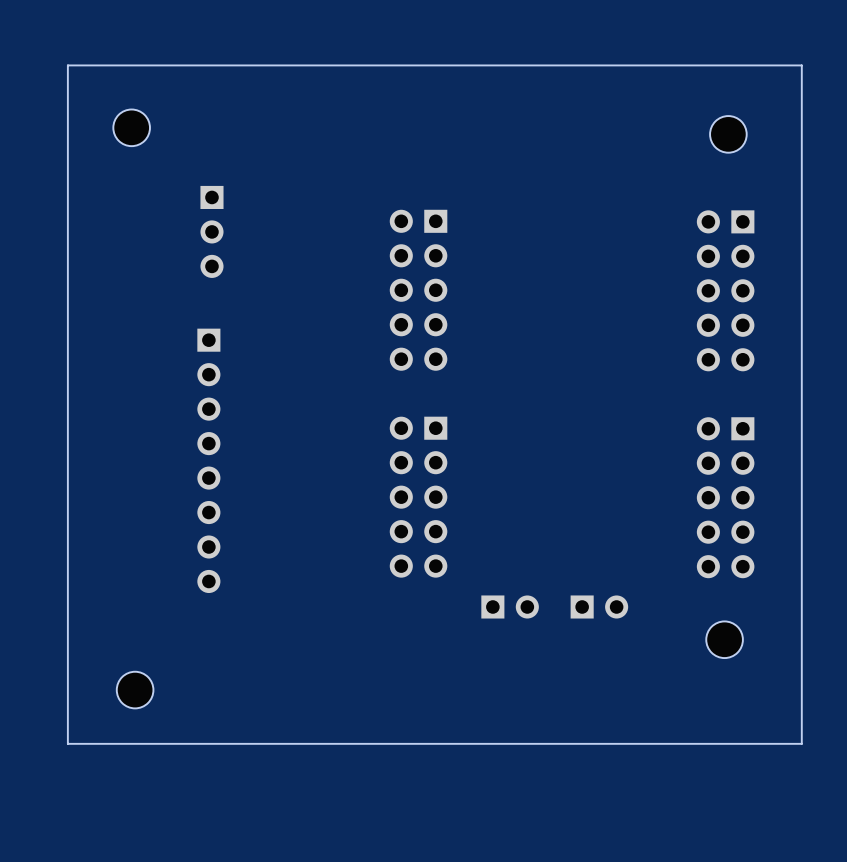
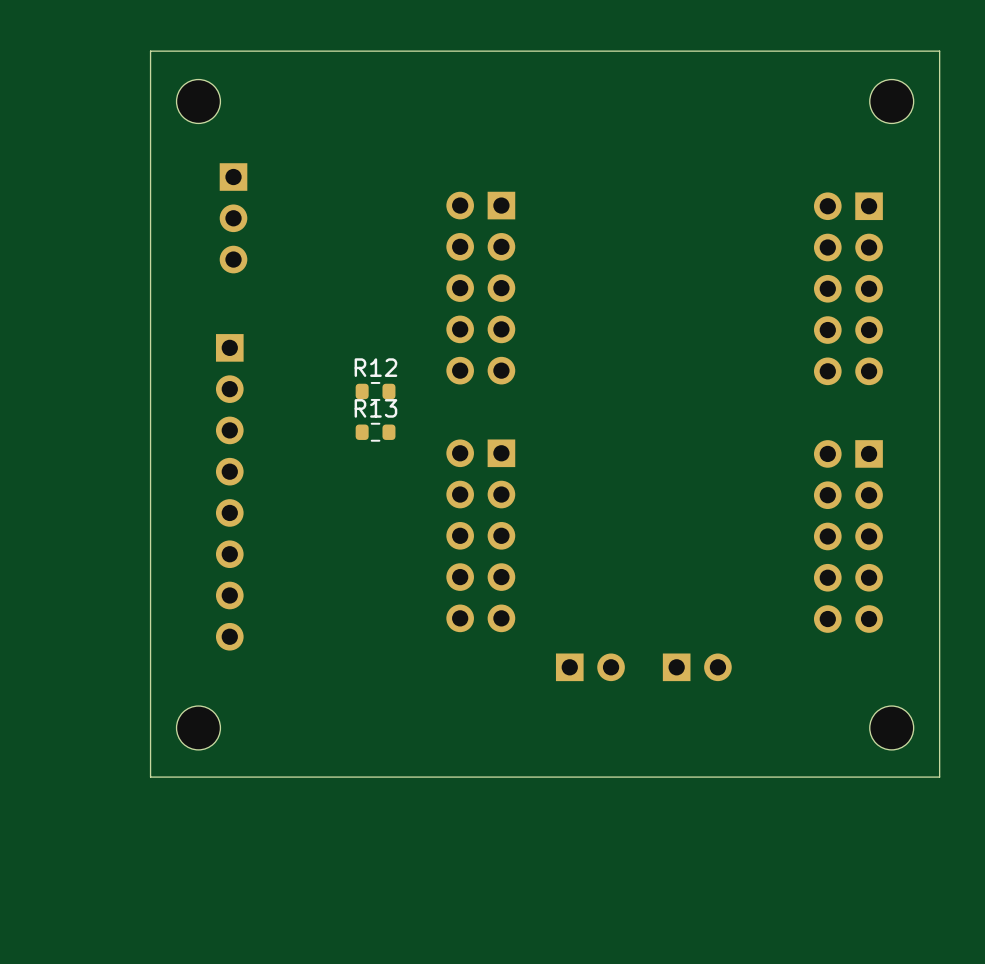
board edge: (801, 92) (801, 65) (67, 65) (67, 743) (801, 743) (801, 698) -> (939, 51) (150, 51) (150, 777) (939, 777)
part position: (131, 127) -> (198, 101)
part position: (728, 134) -> (891, 101)
R12: none -> (375, 391)
R13: none -> (375, 432)
part position: (724, 639) -> (891, 727)
part position: (135, 690) -> (198, 727)

